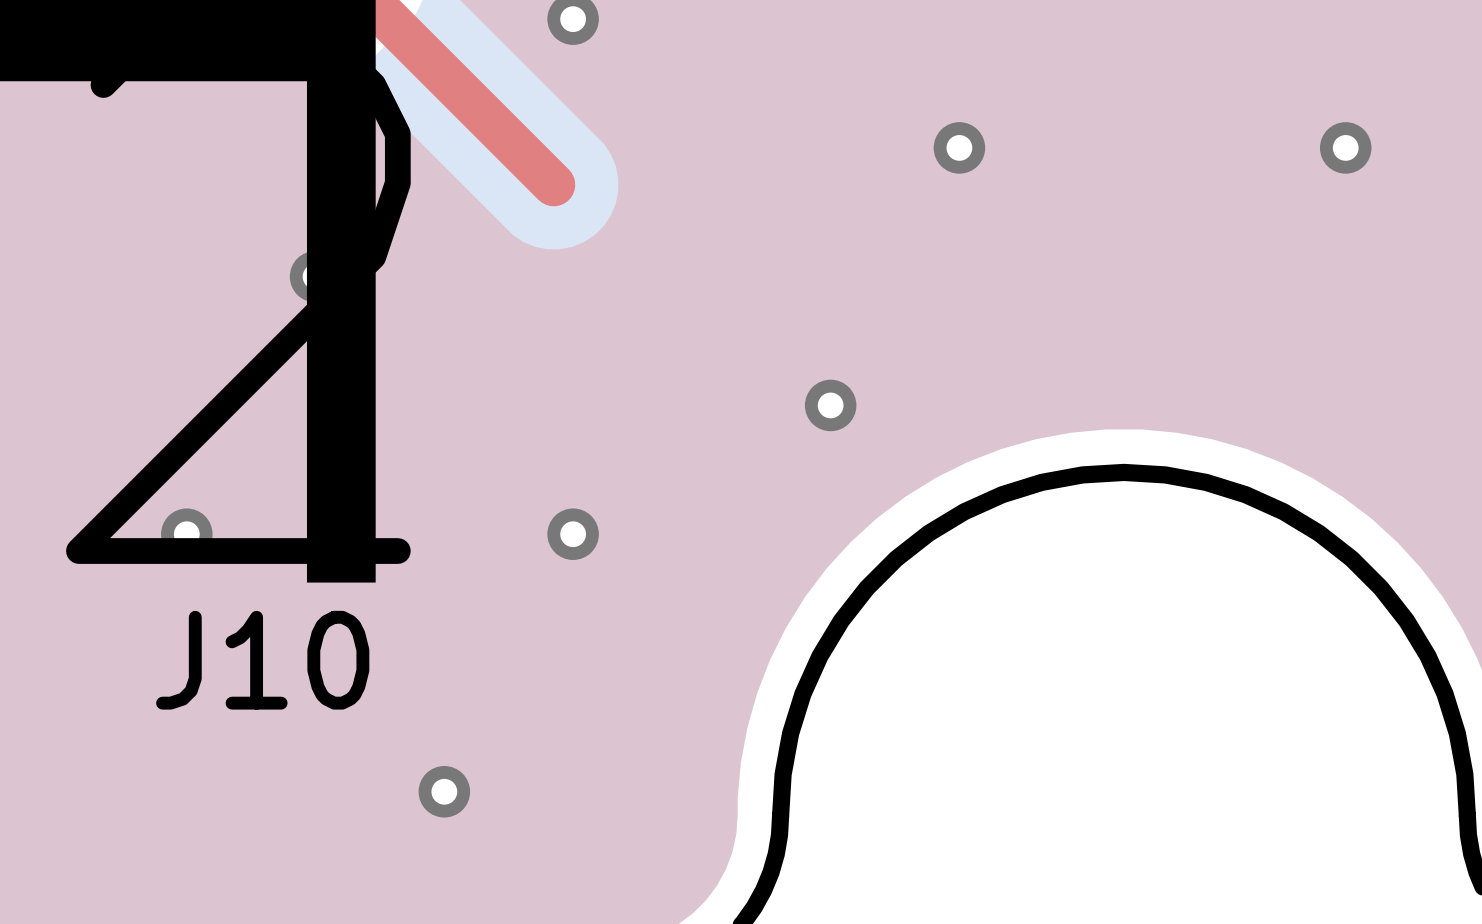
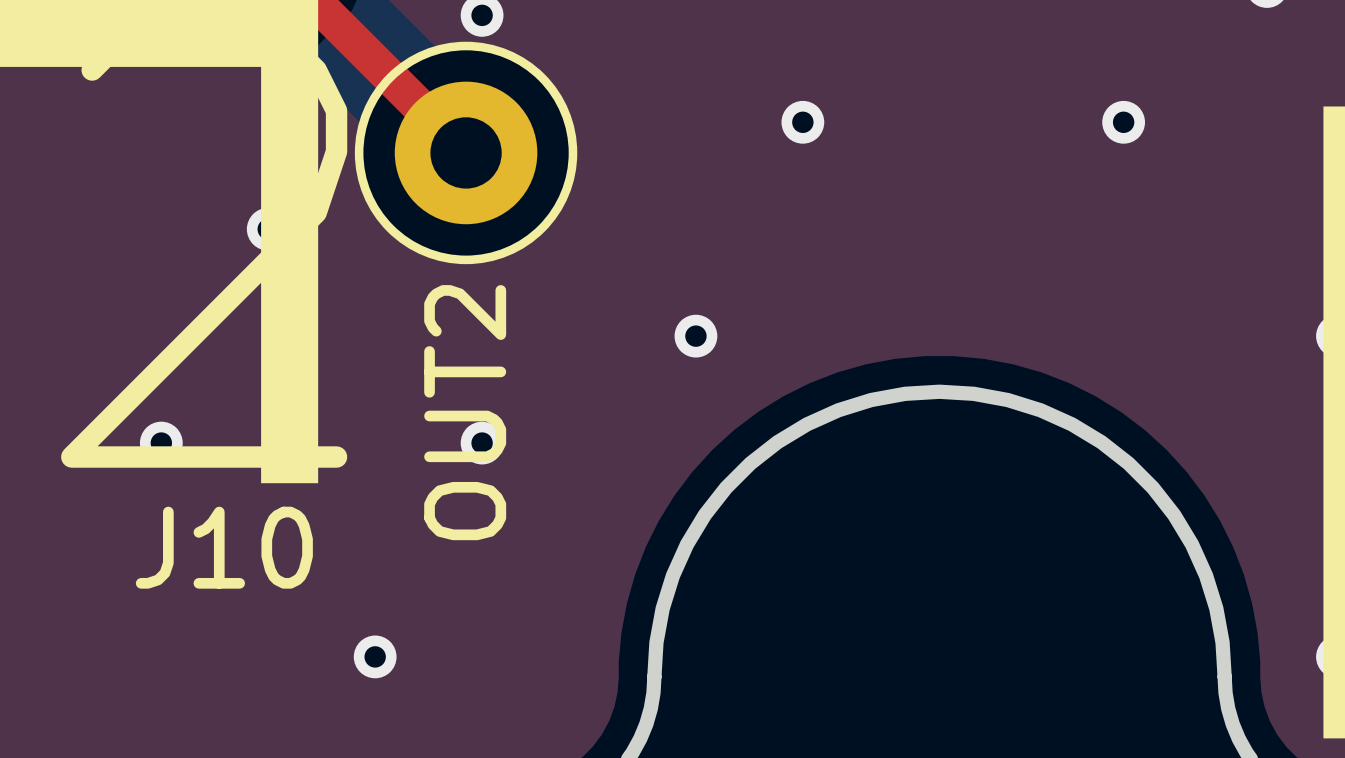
OUT2: none -> (466, 152)

